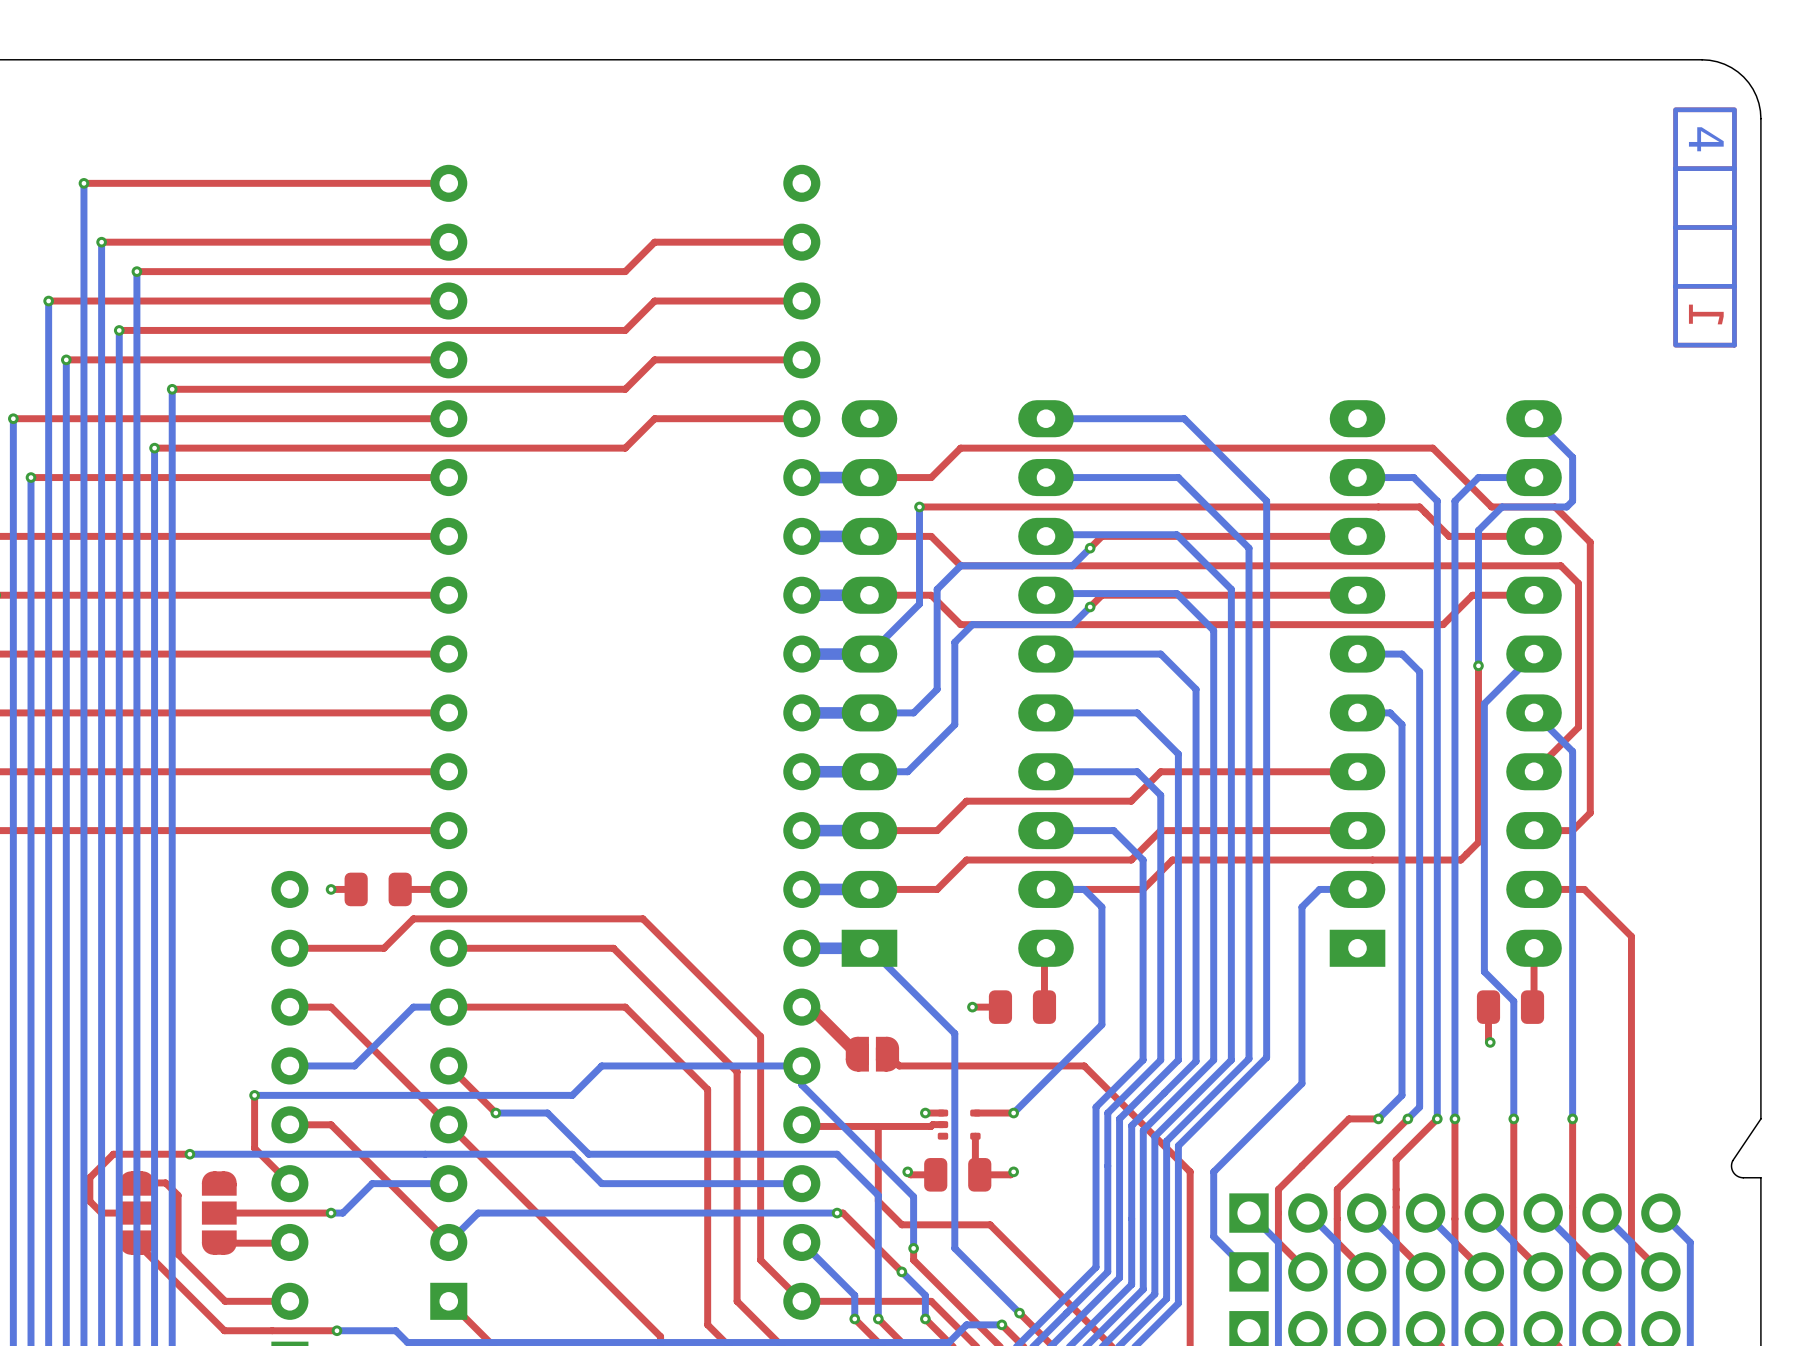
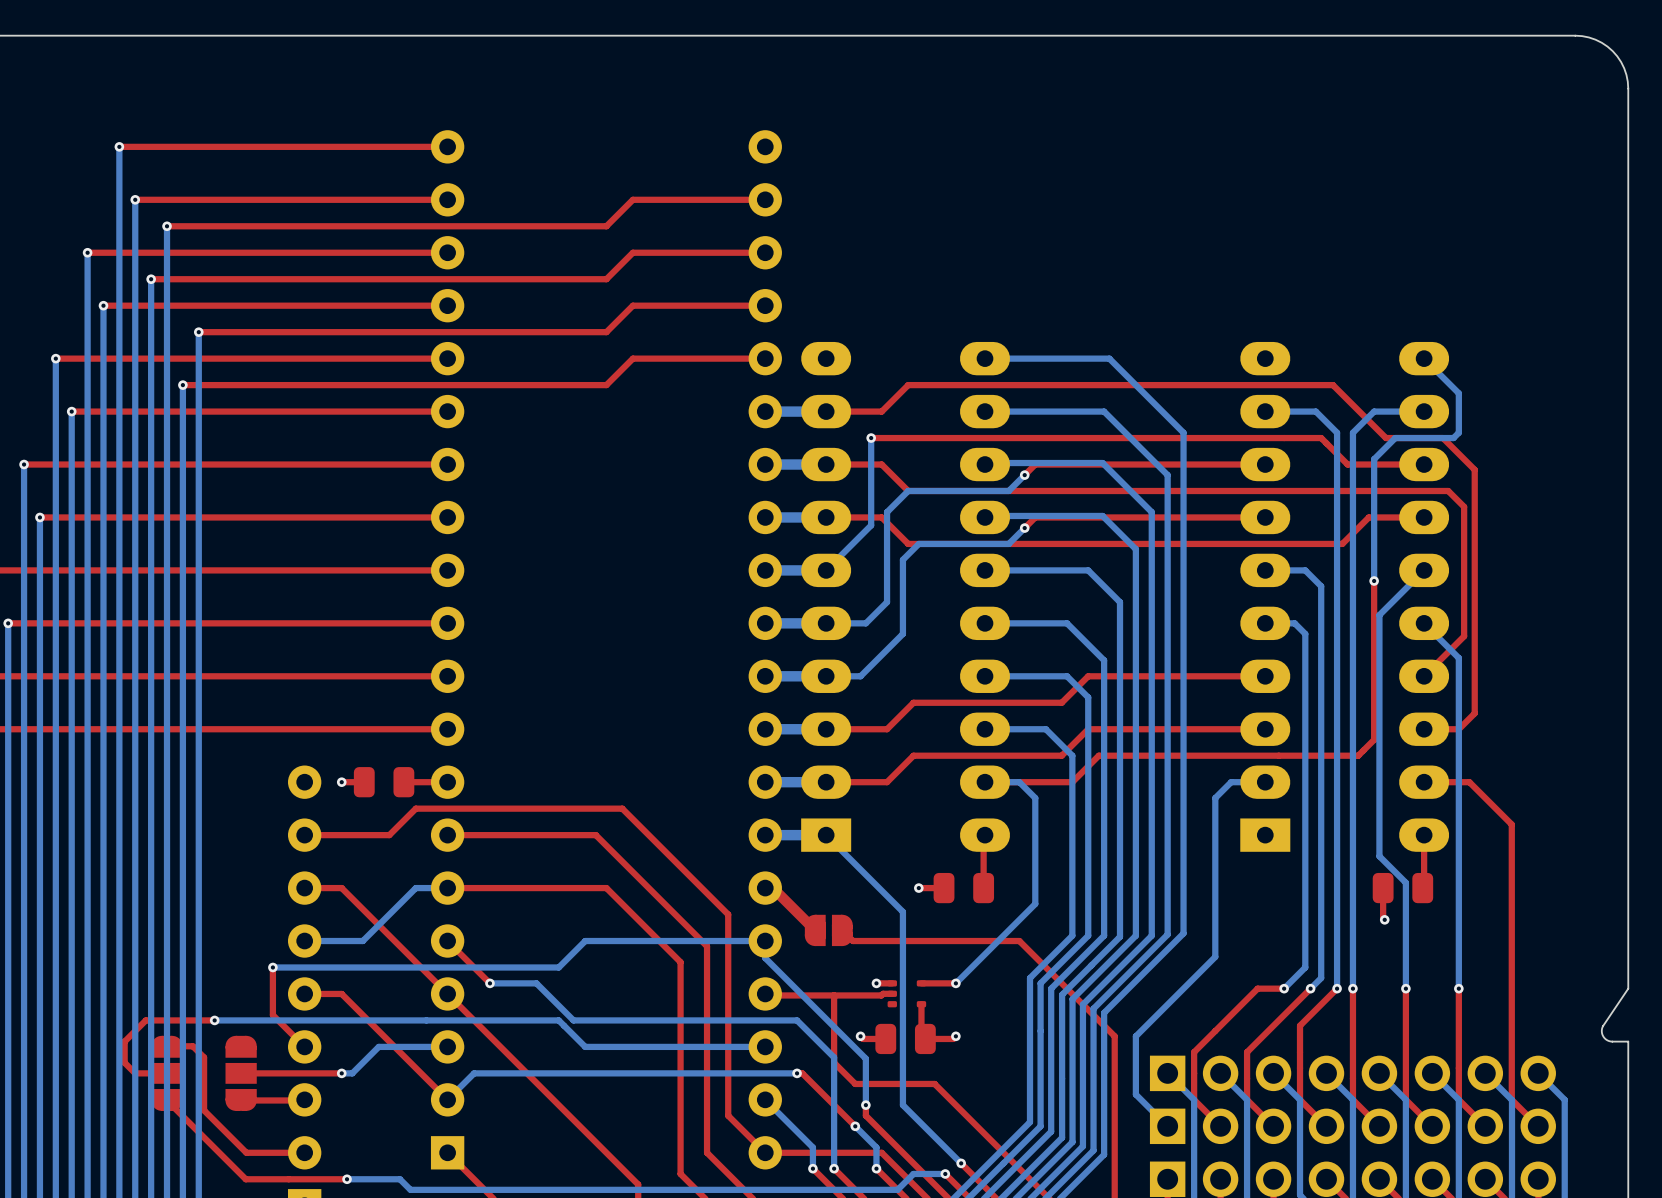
drawing: [1673, 107, 1737, 348] -> none

